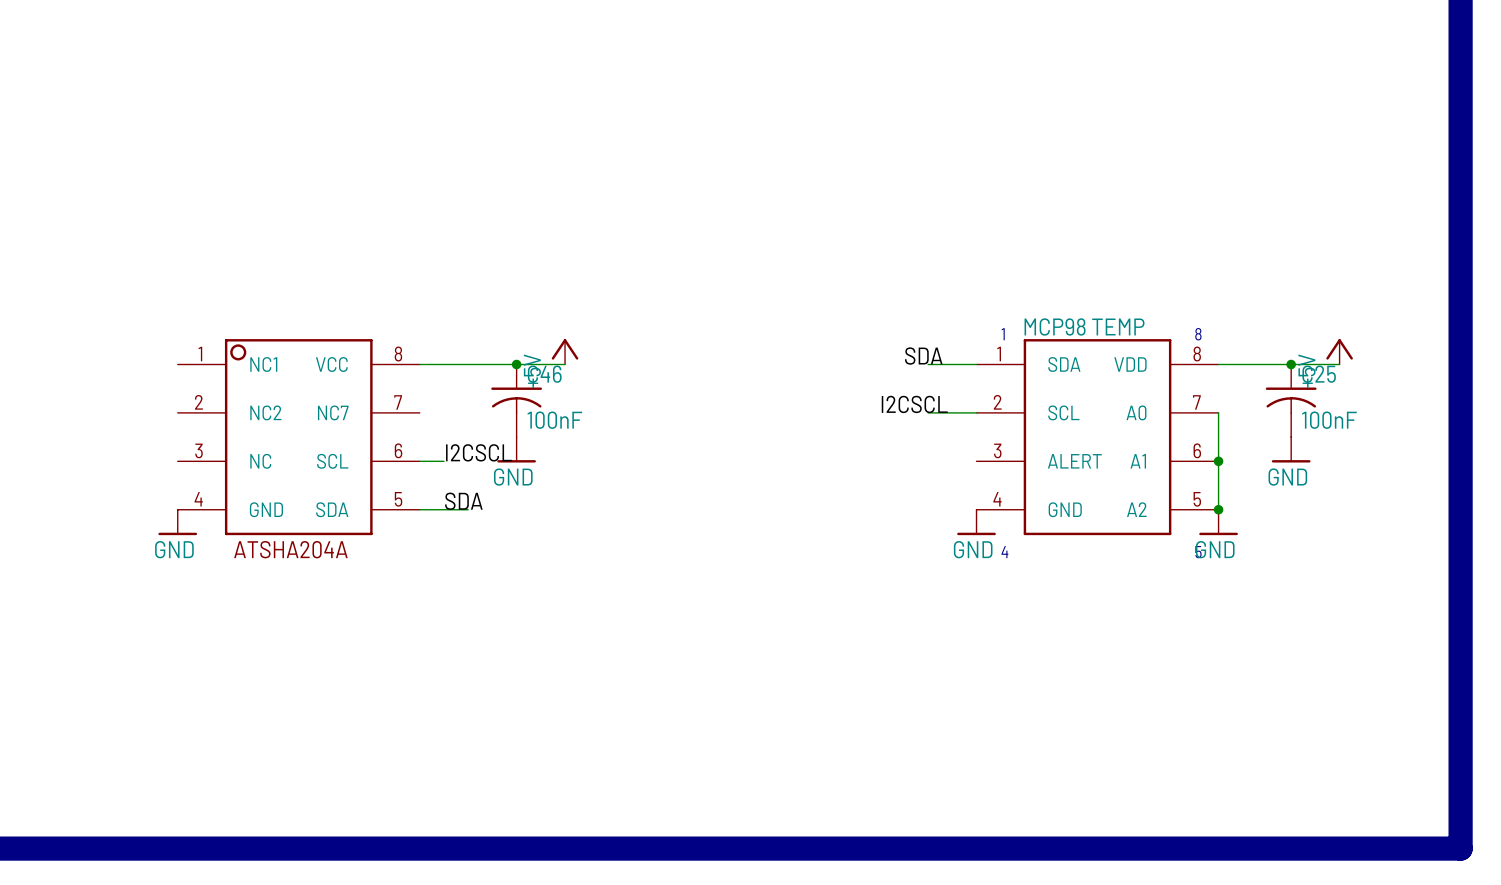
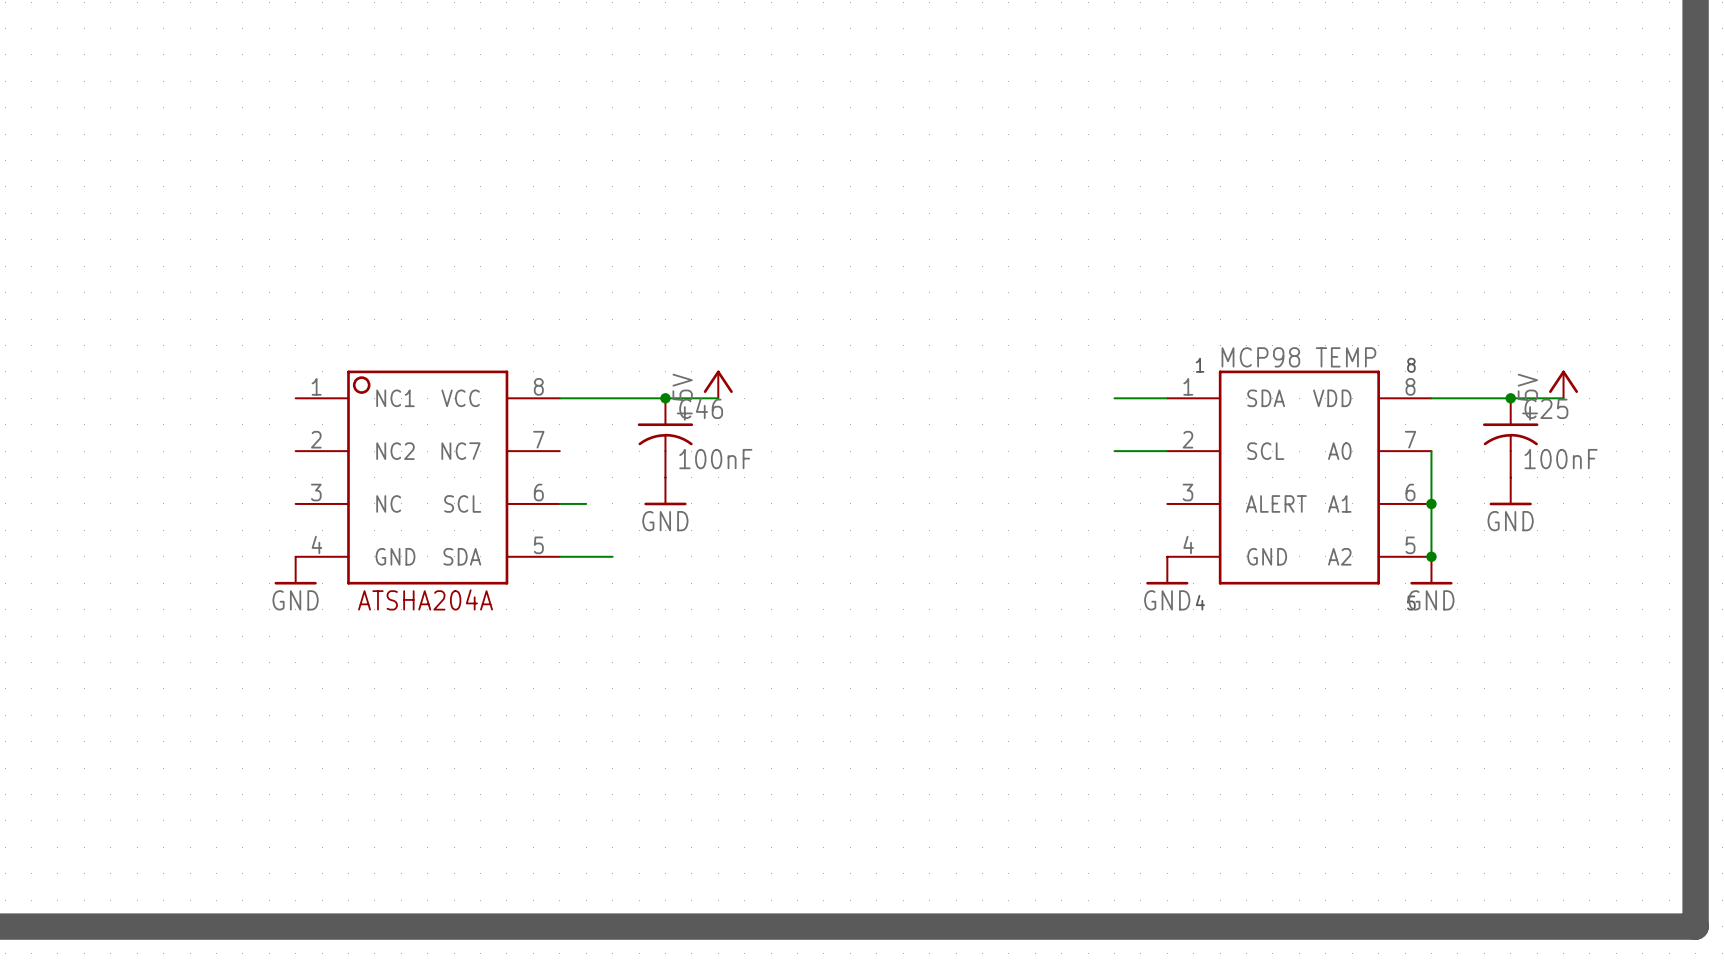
label: SDA (923, 356) -> none
label: I2CSCL (914, 404) -> none
label: I2CSCL (479, 452) -> none
label: SDA (463, 501) -> none

